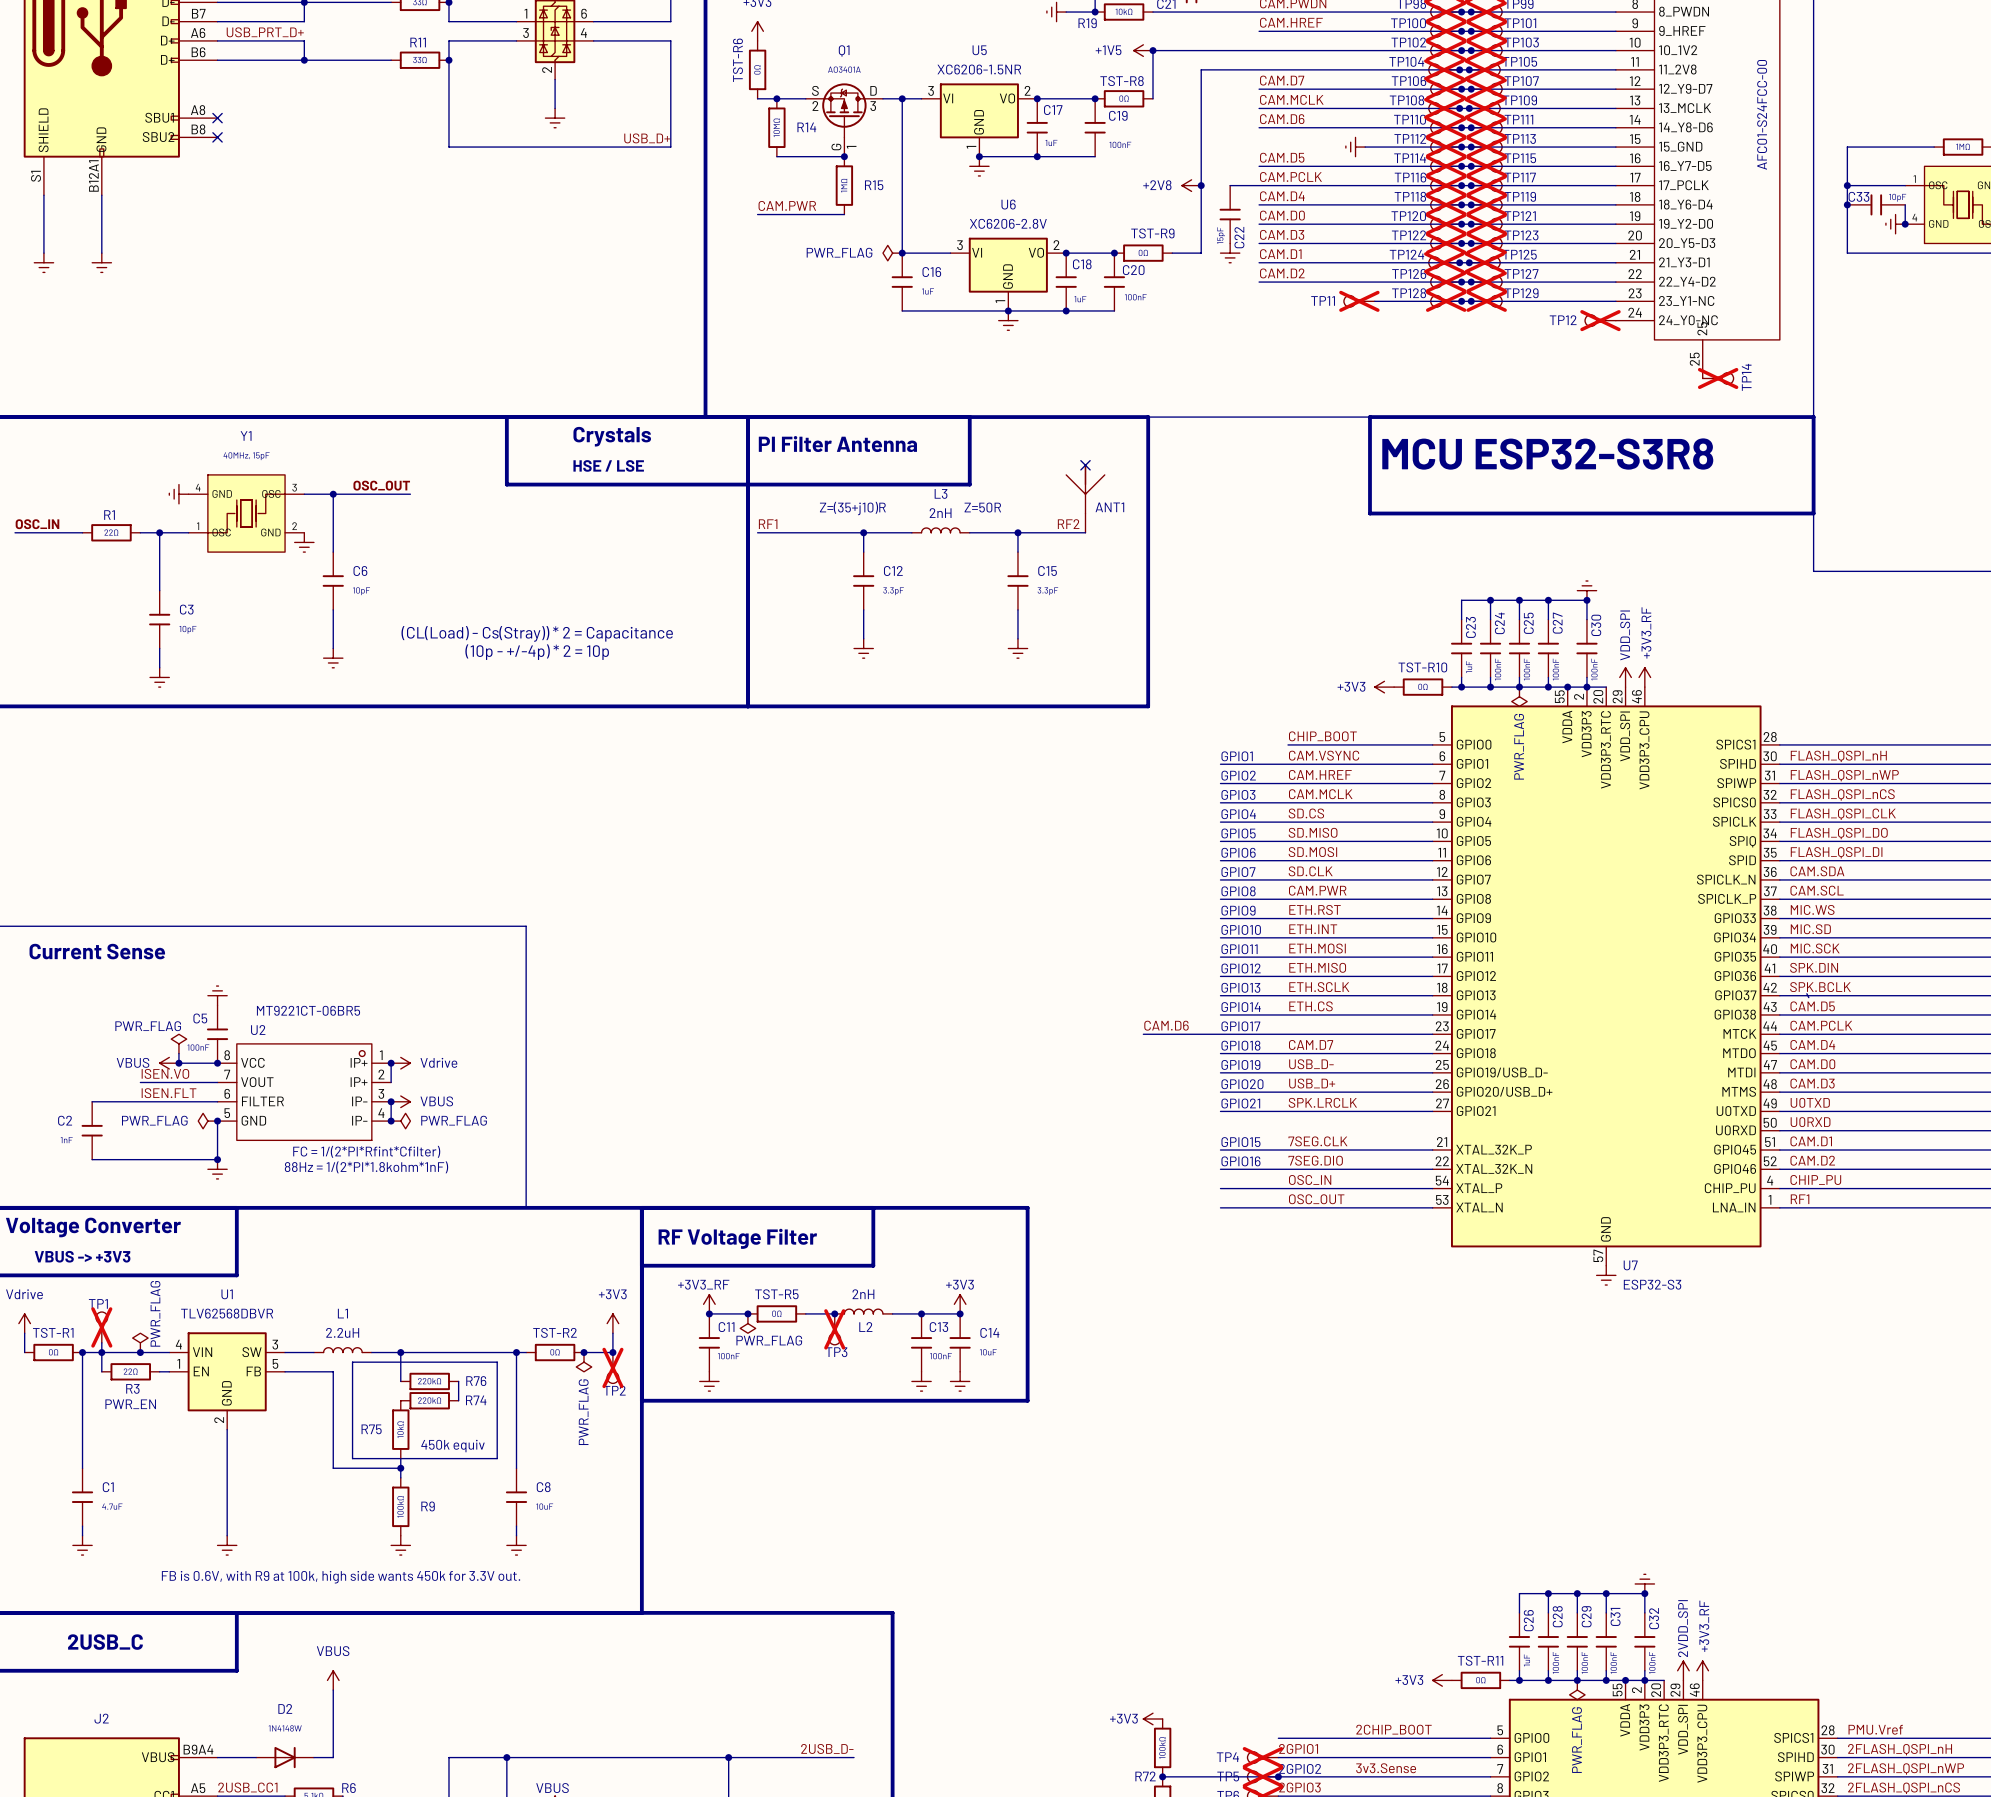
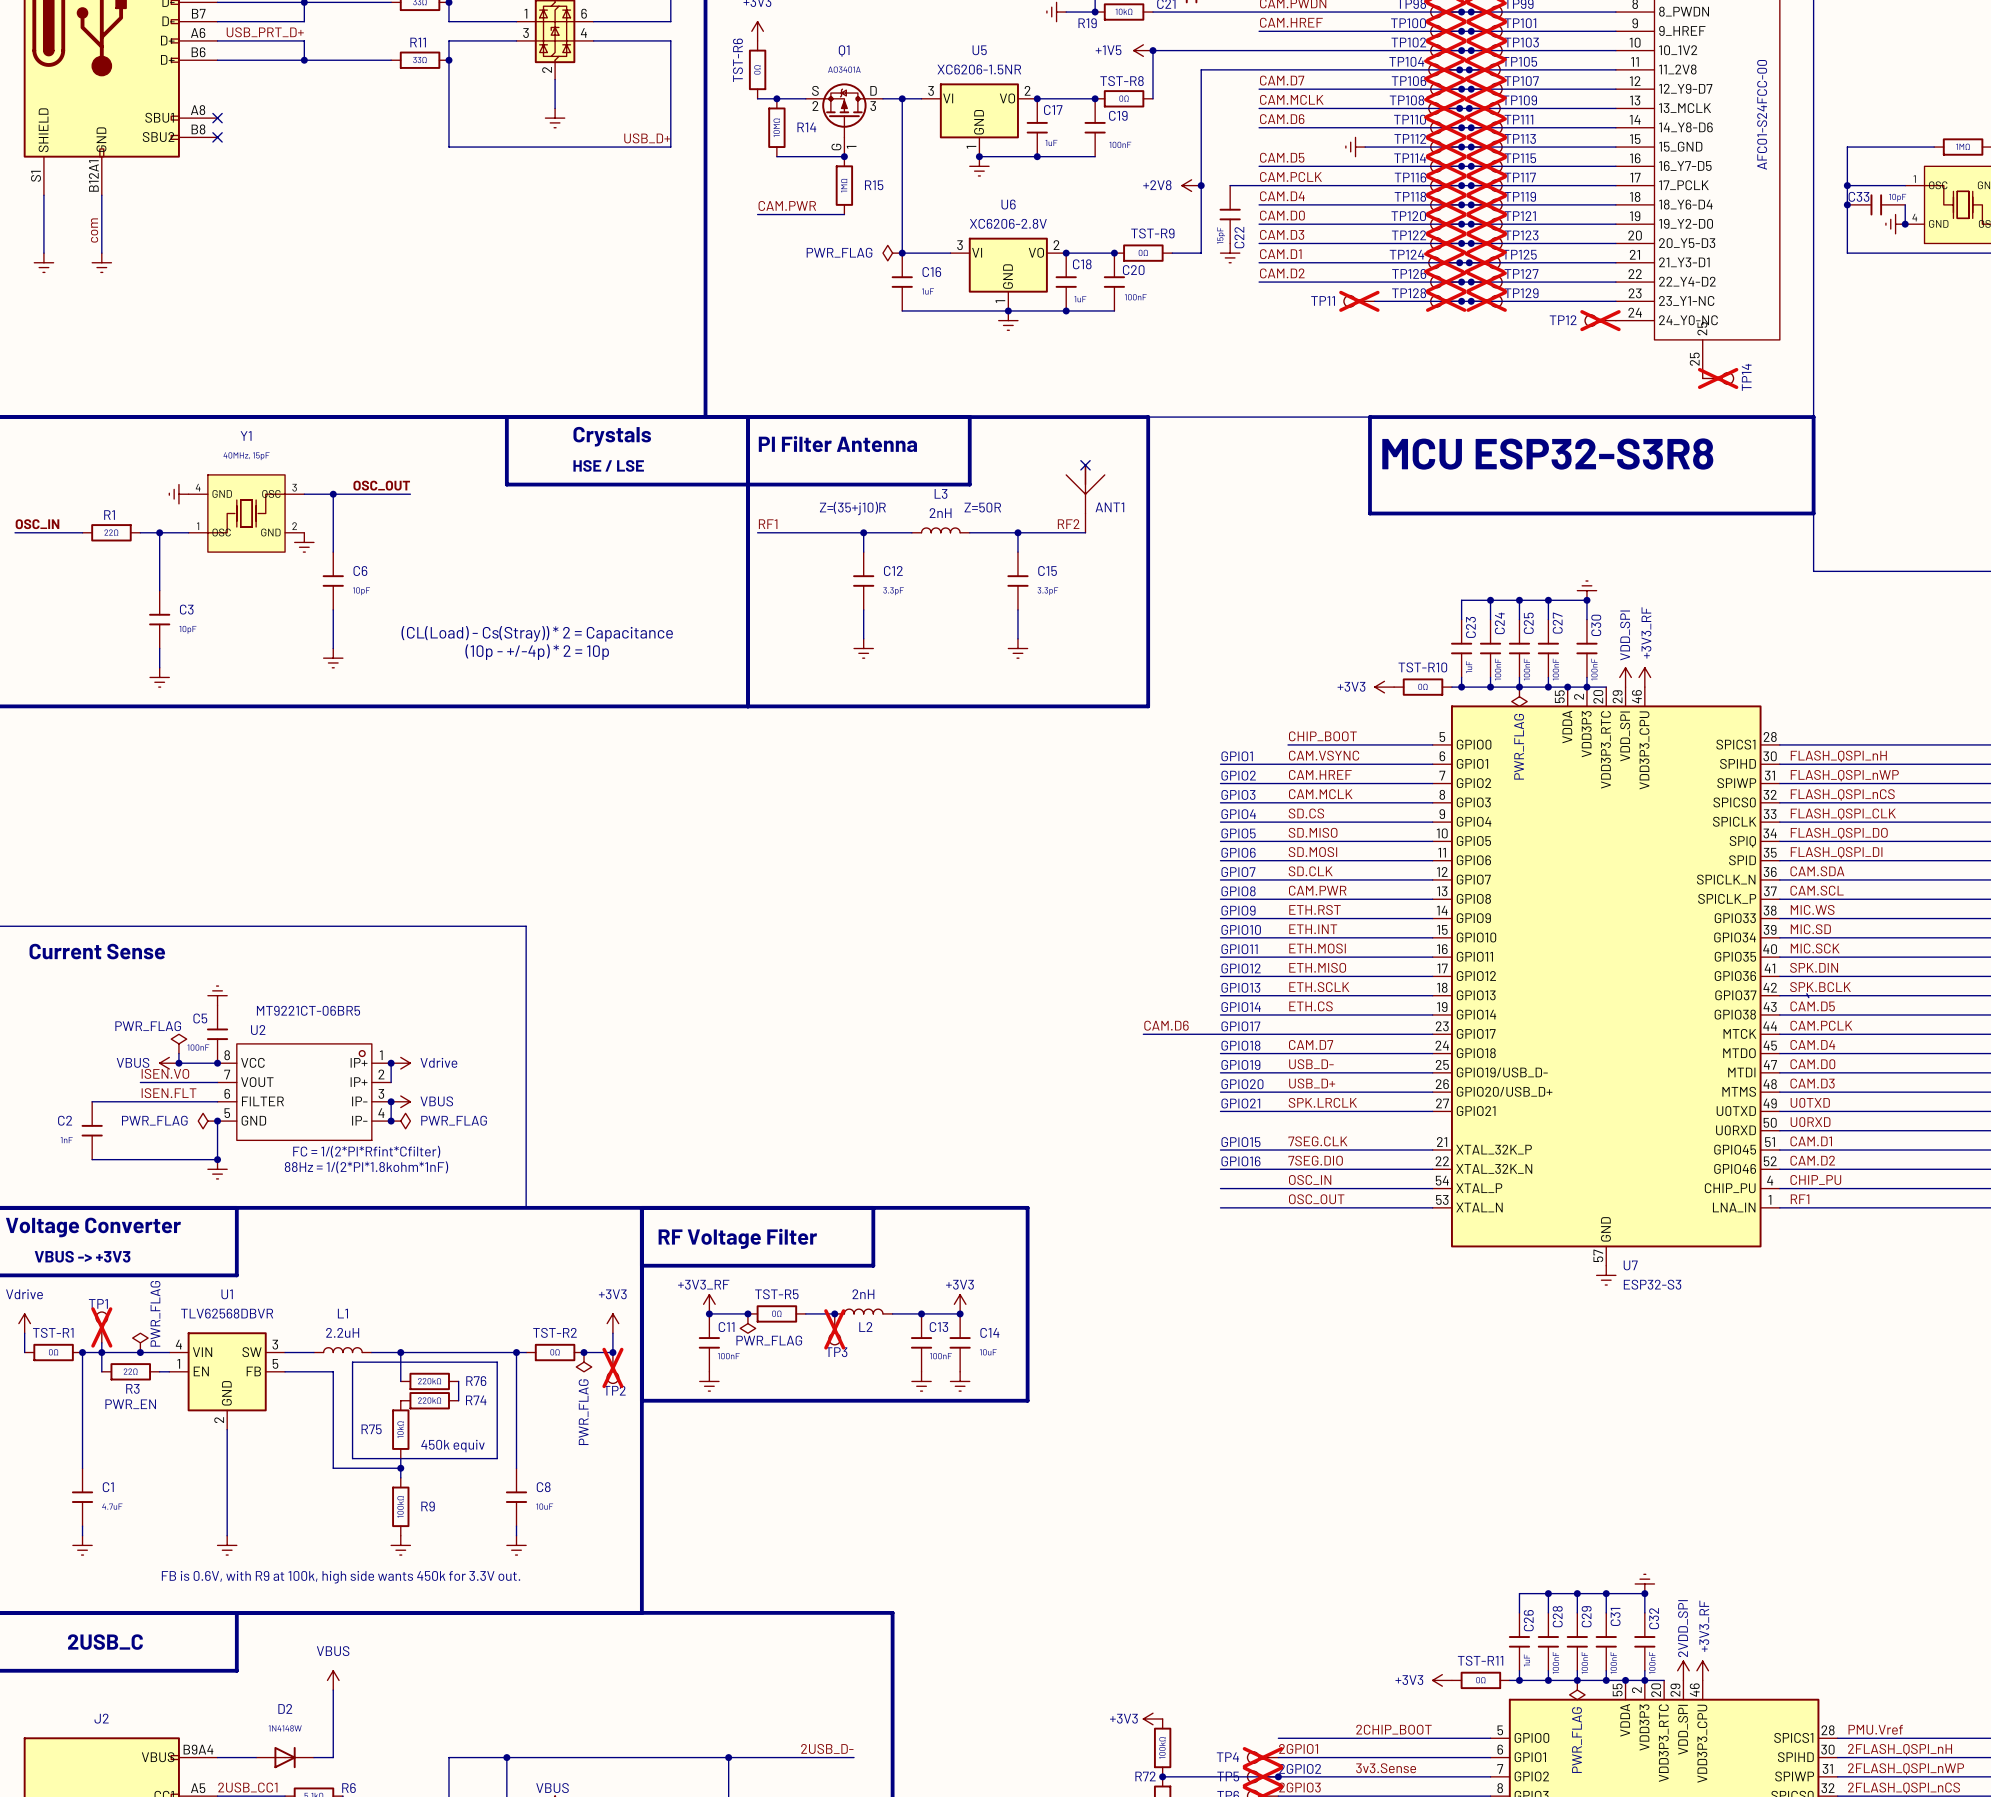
label: none -> com (94, 230)

